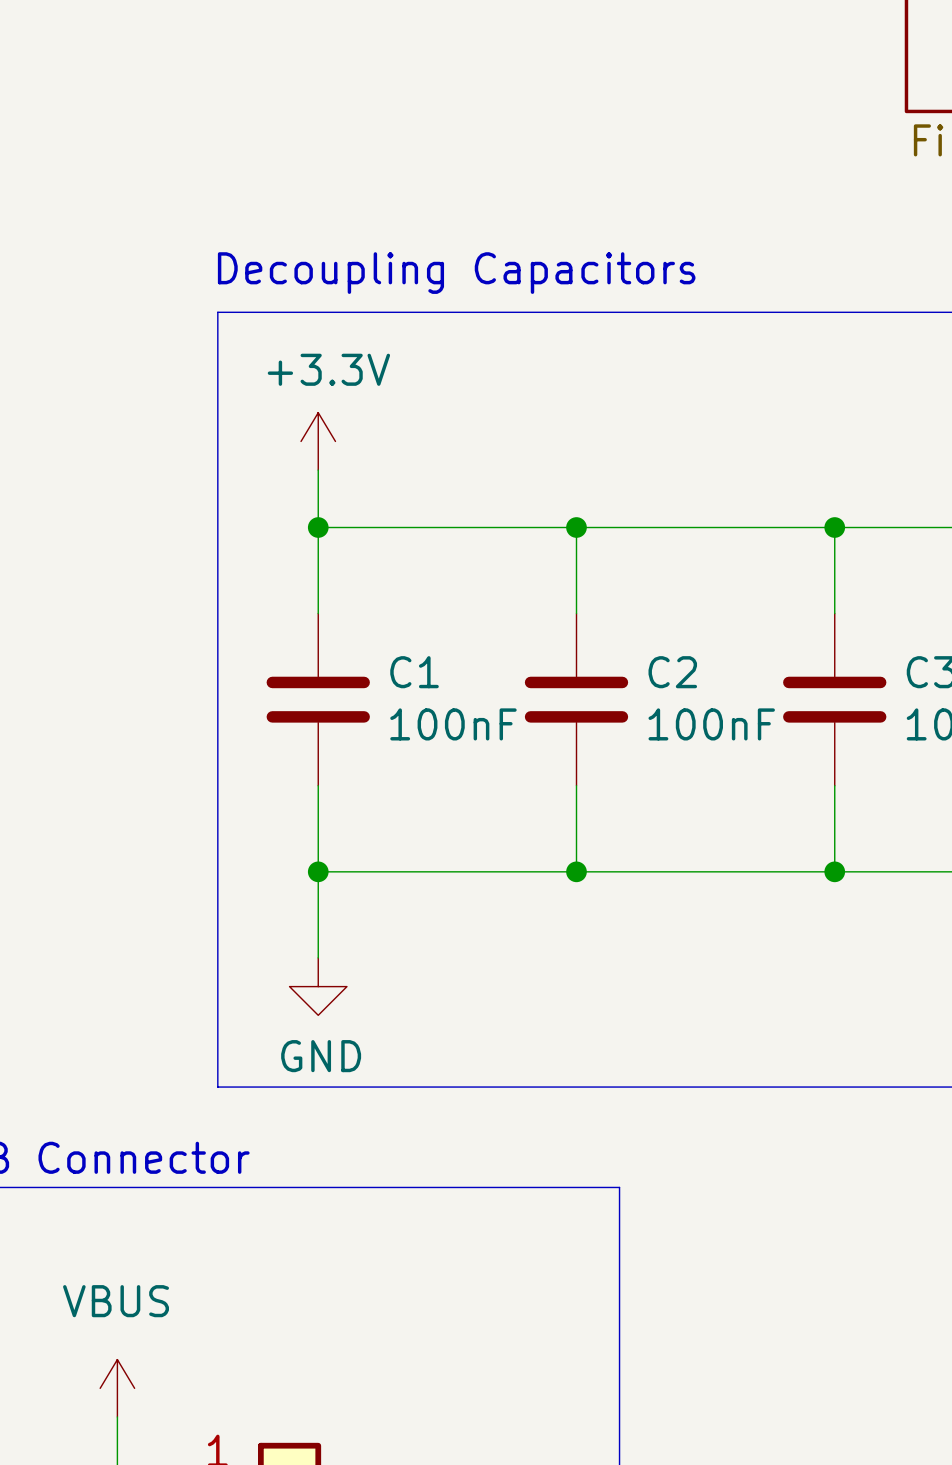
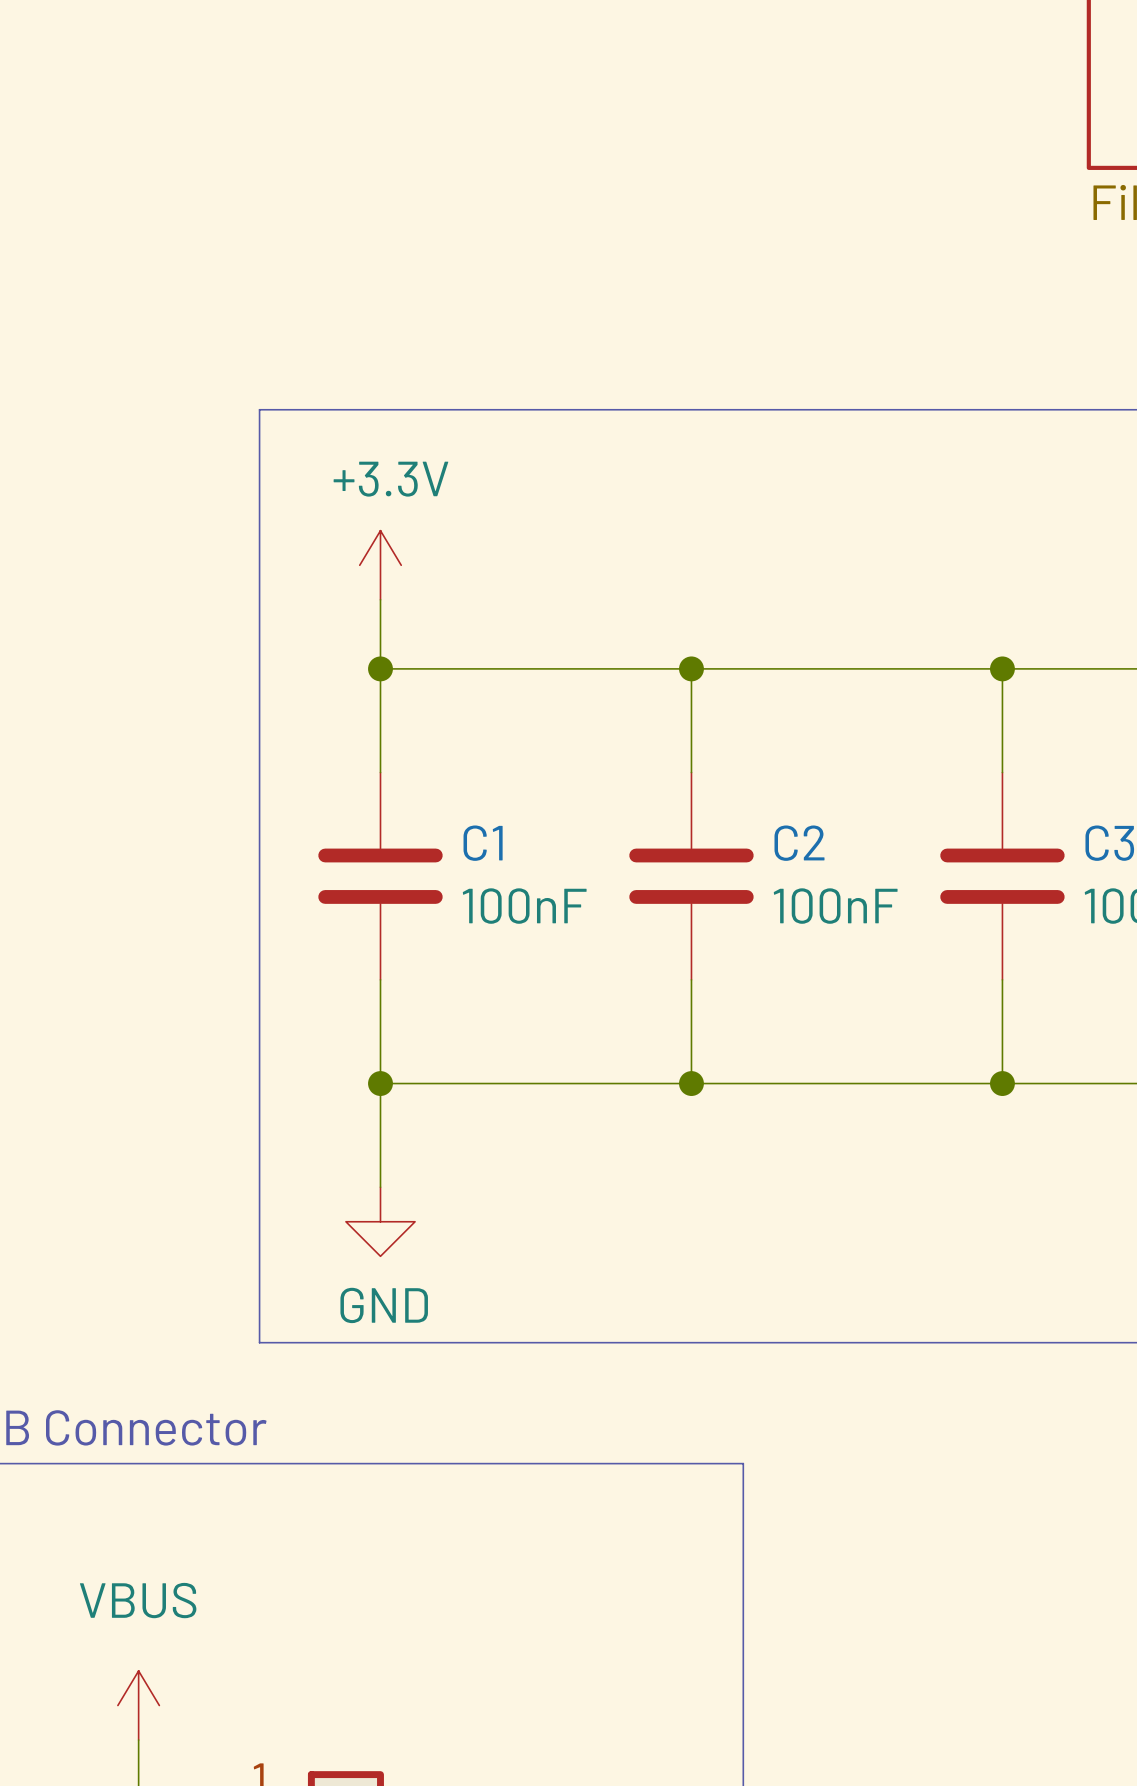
text: Decoupling Capacitors (456, 273) -> none

